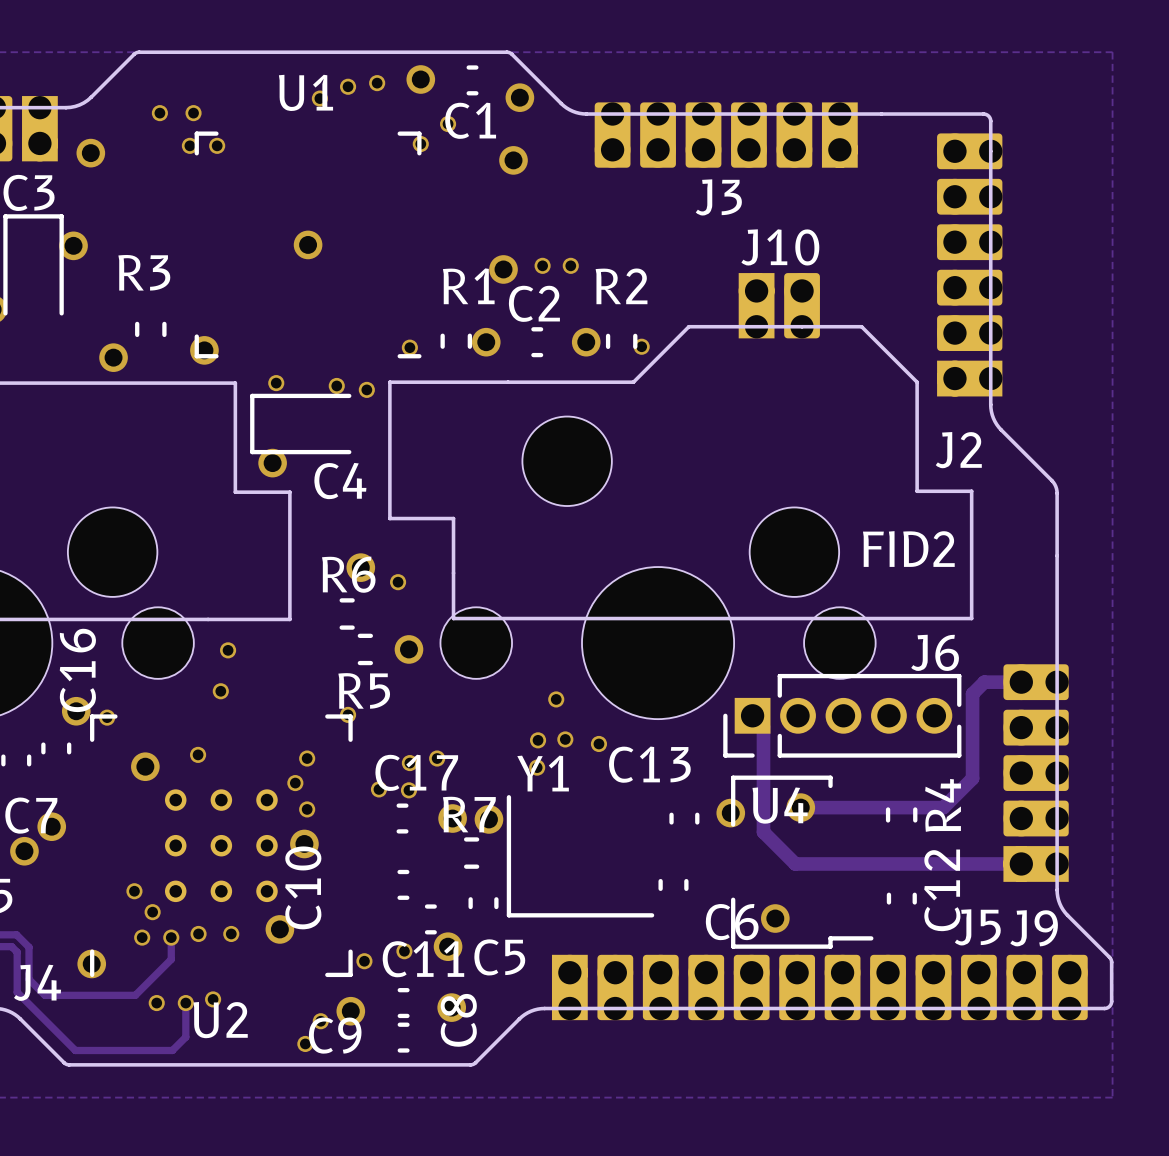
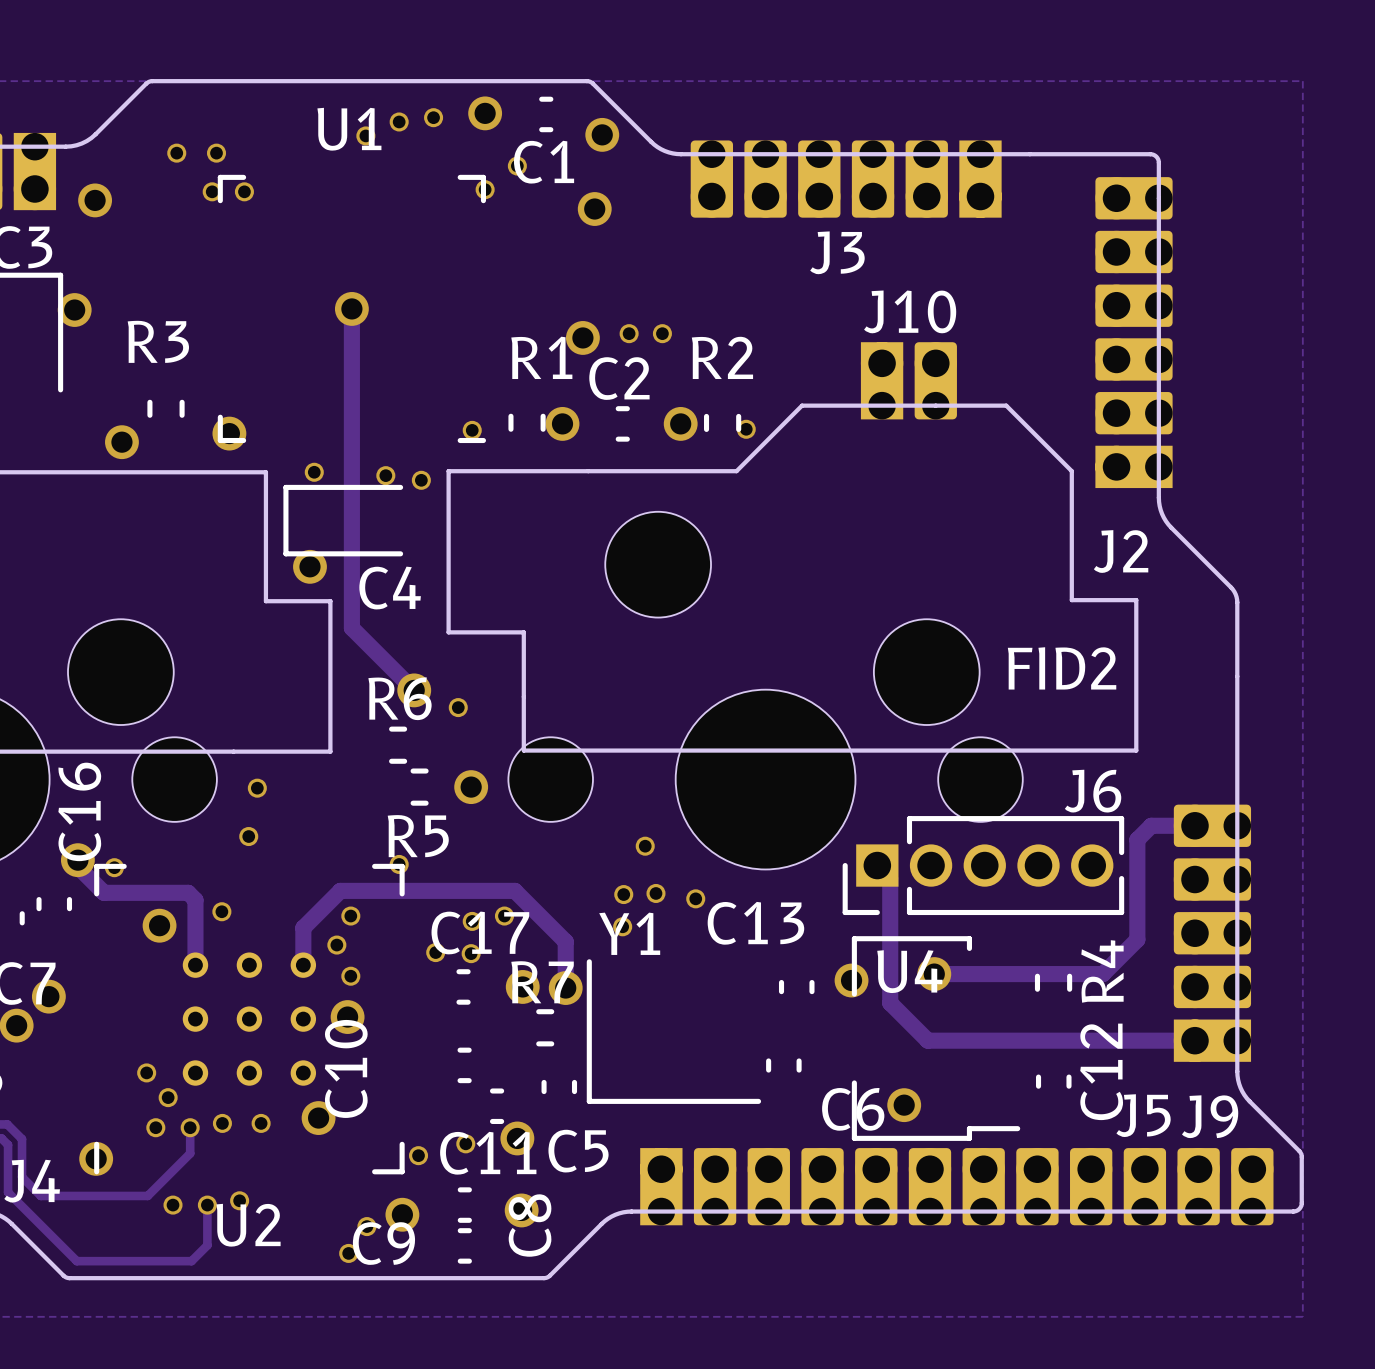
track: none -> (351, 308) (351, 628) (414, 690)
track: none -> (77, 860) (77, 866) (104, 892) (188, 892) (195, 900) (195, 965)
track: none -> (303, 965) (303, 927) (340, 890) (514, 890) (565, 941) (565, 988)

